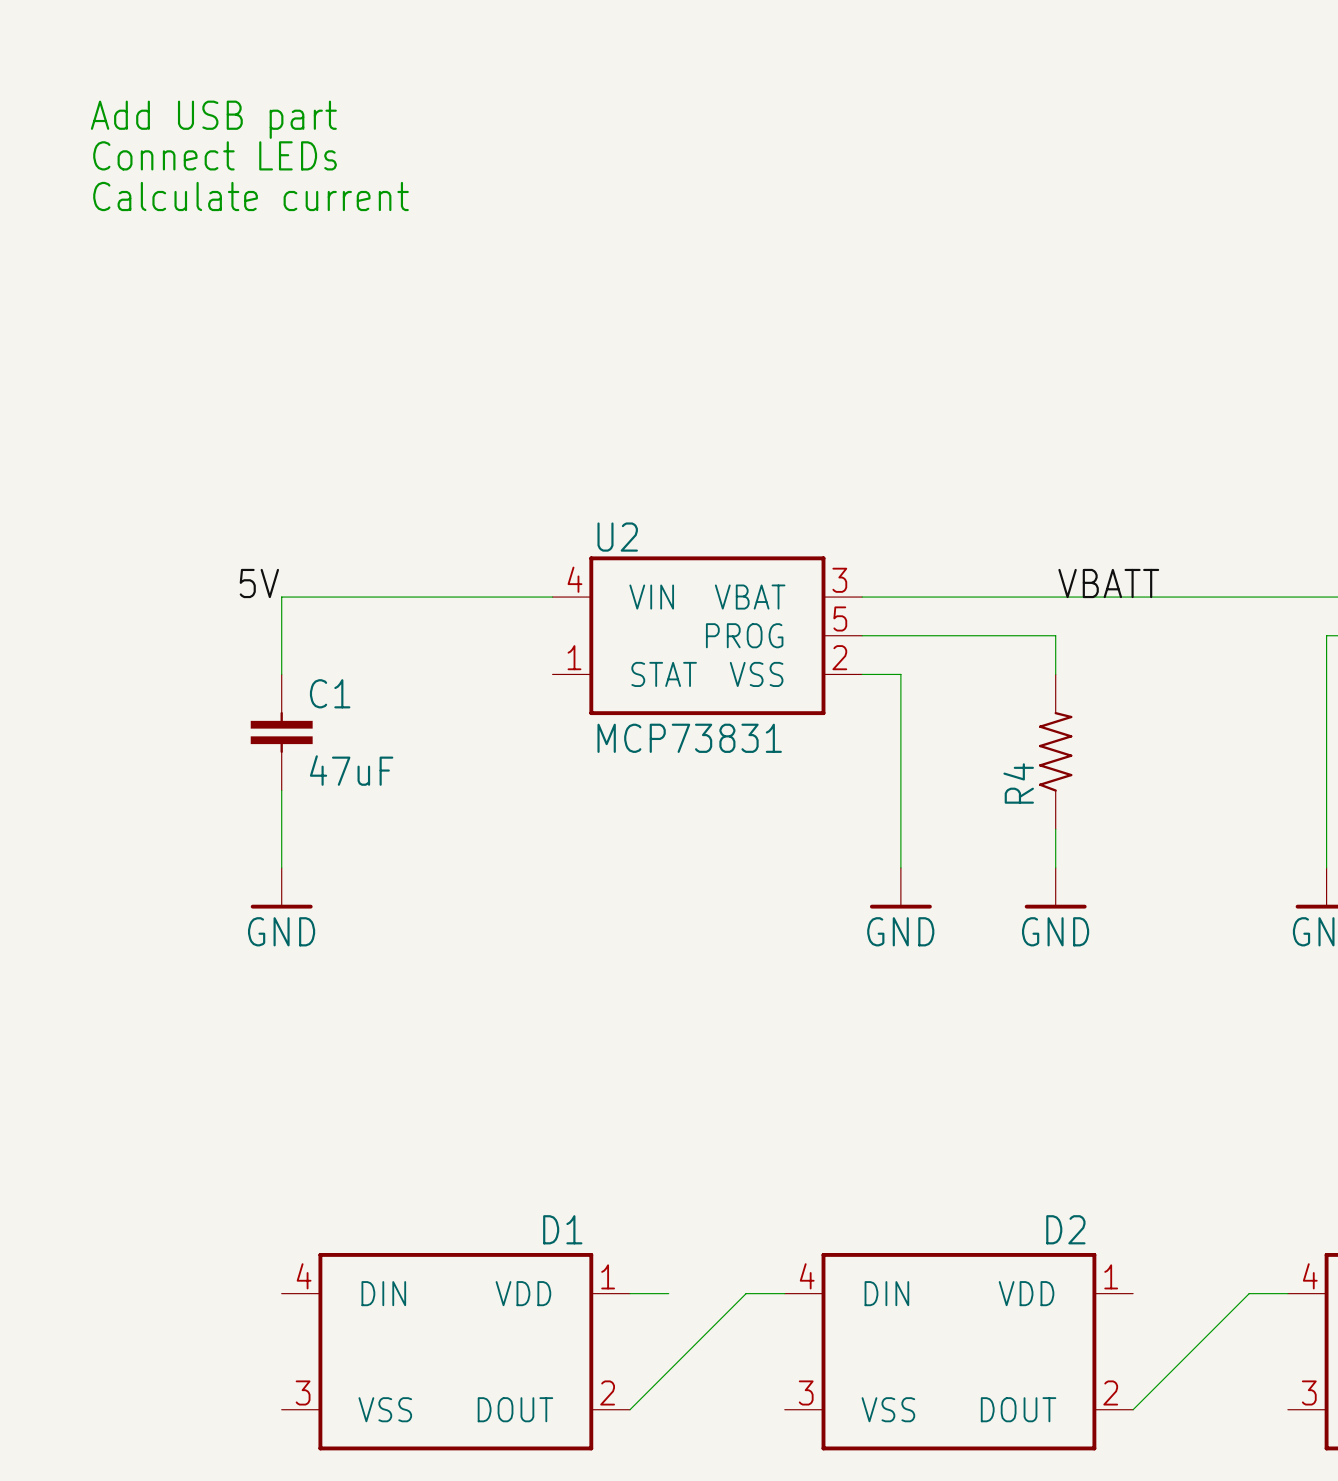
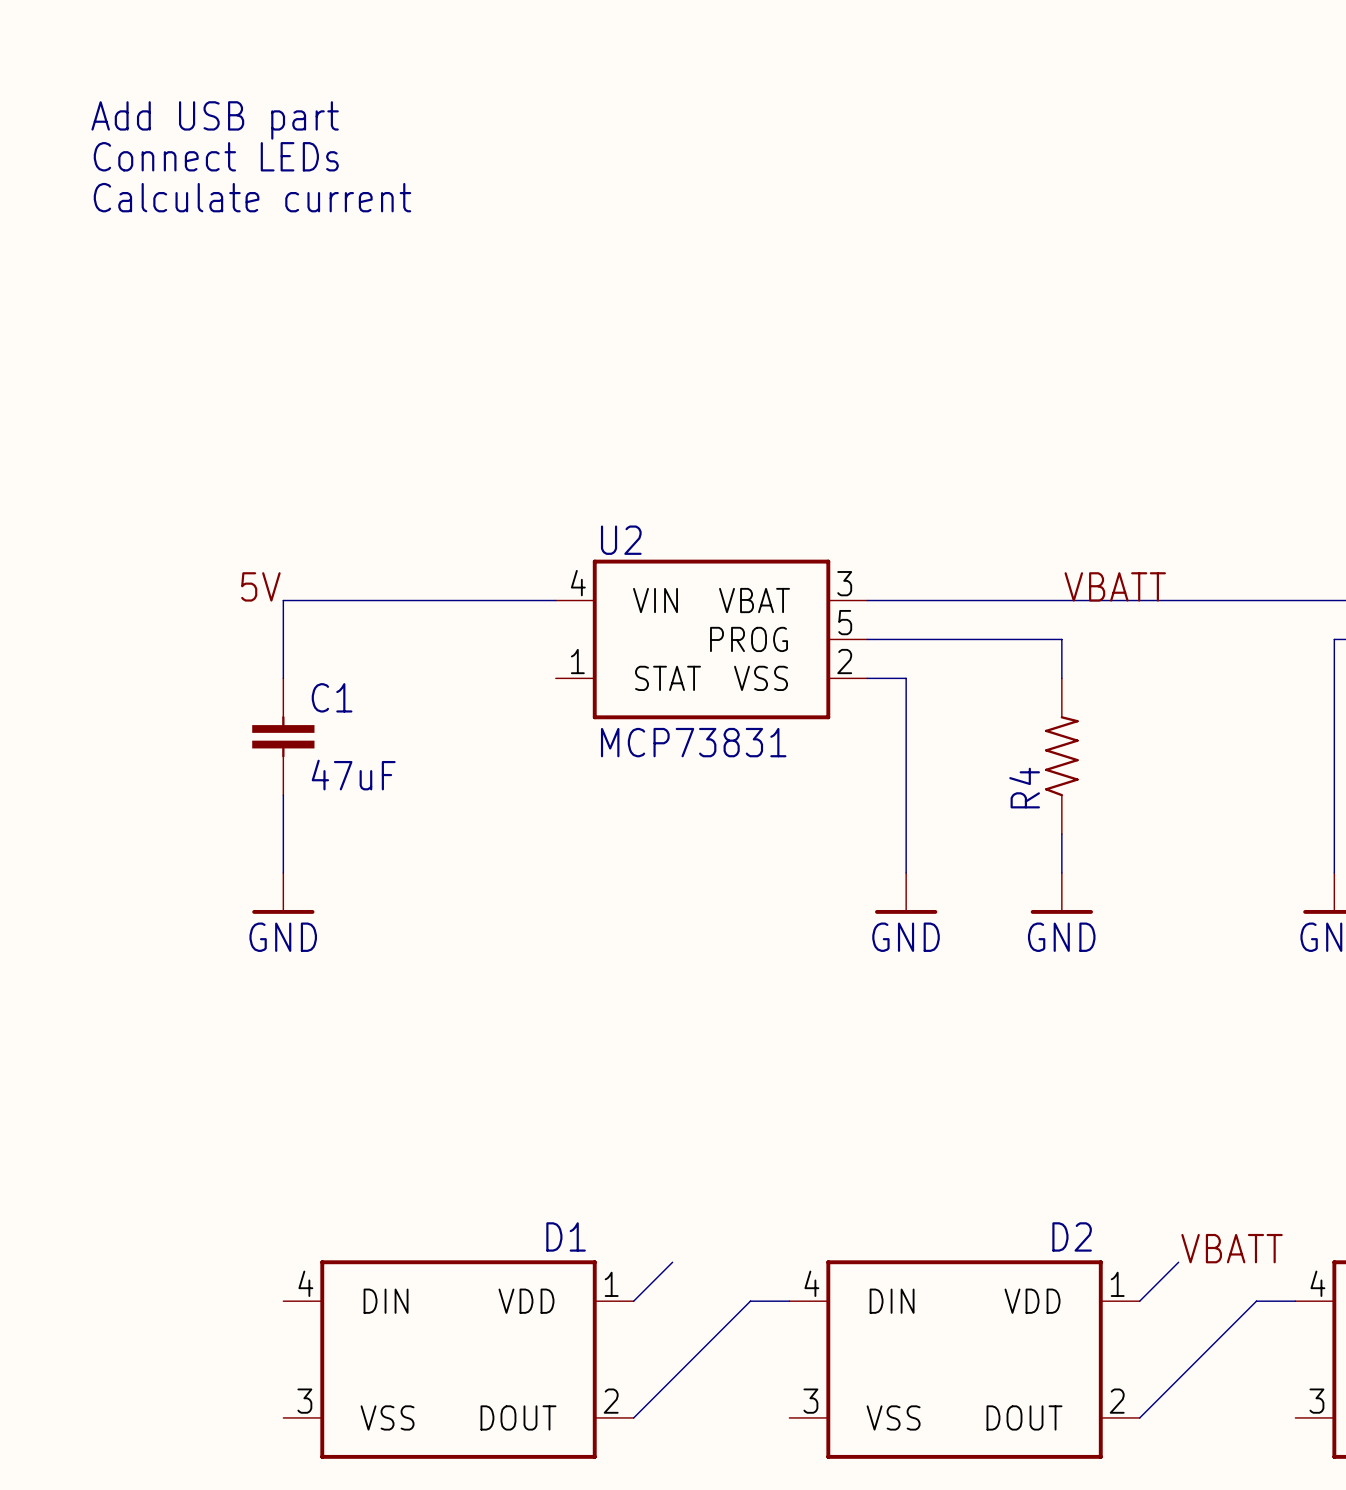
label: none -> VBATT (1232, 1248)
wire: none -> (1178, 1262) (1139, 1301)
wire: (630, 1293) (668, 1293) -> (633, 1301) (672, 1262)

